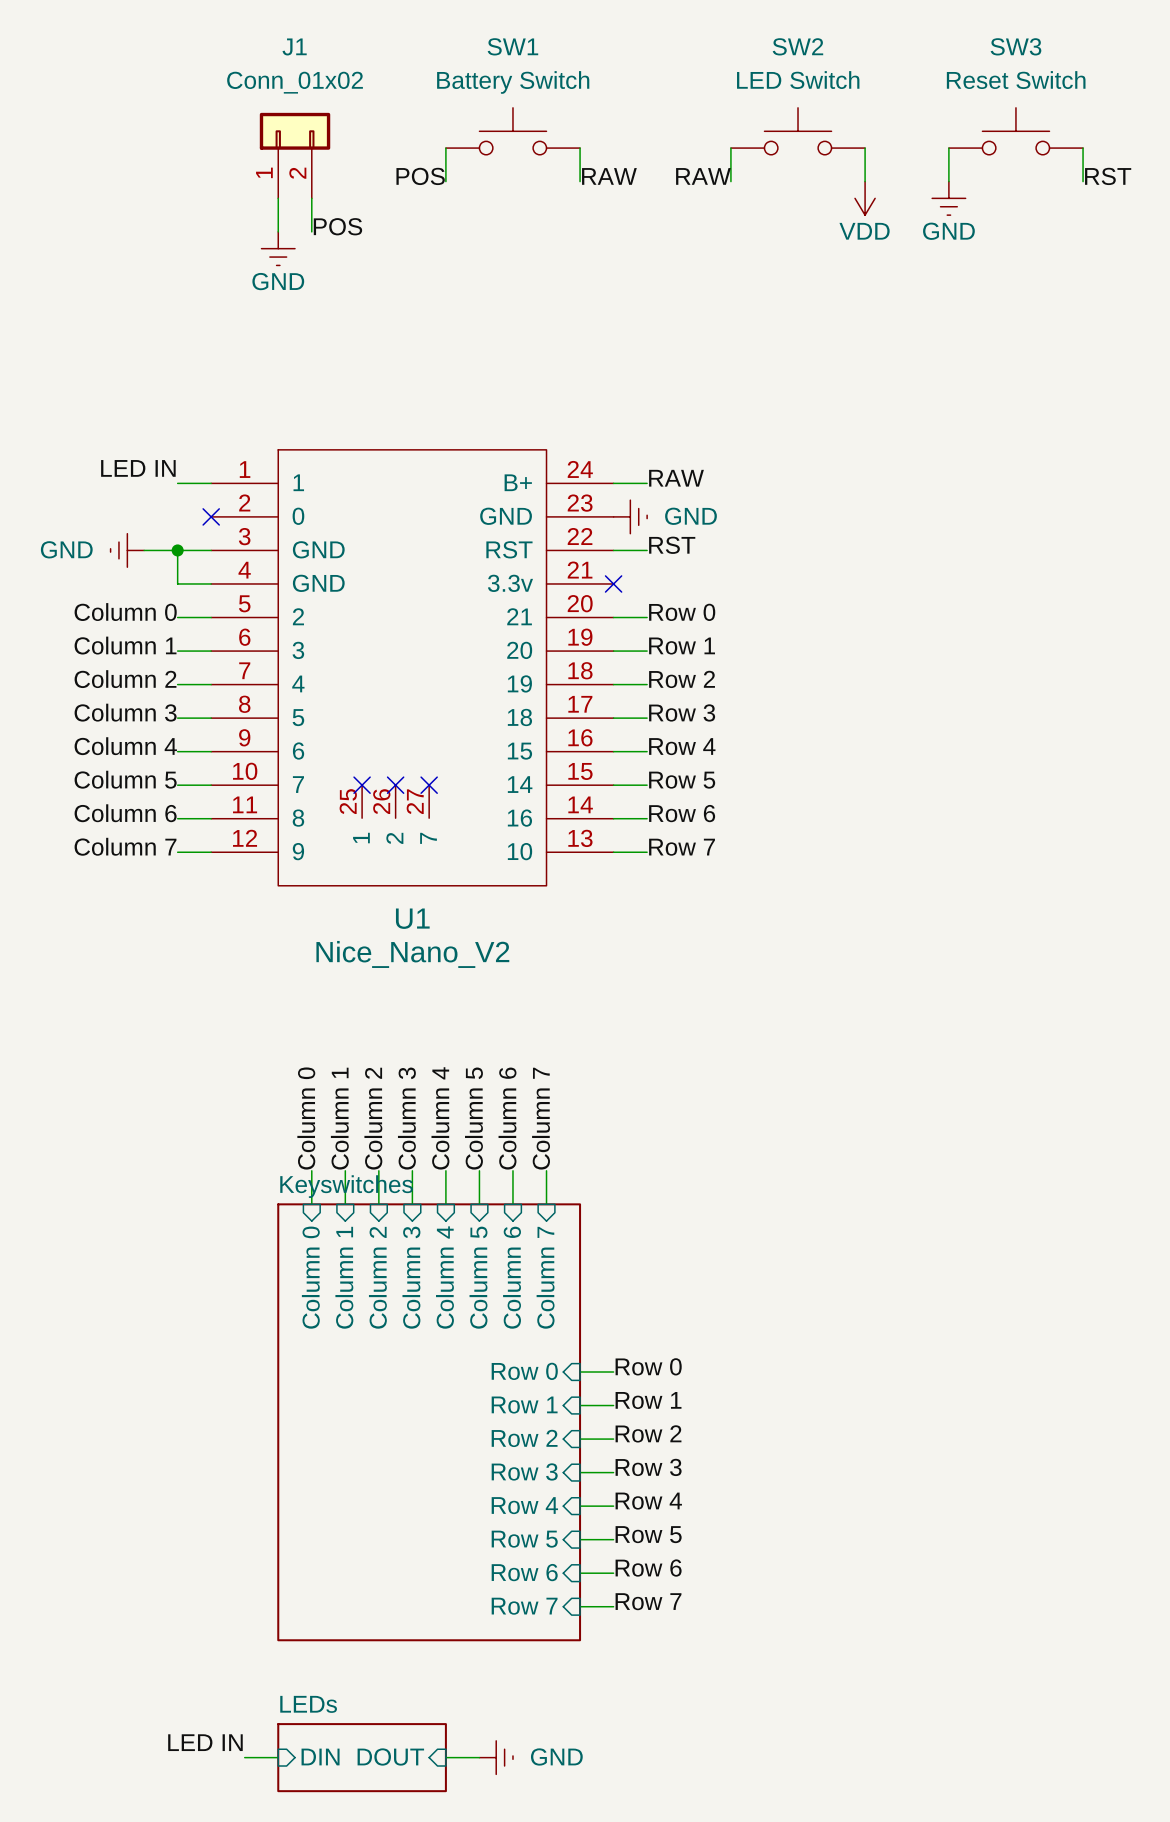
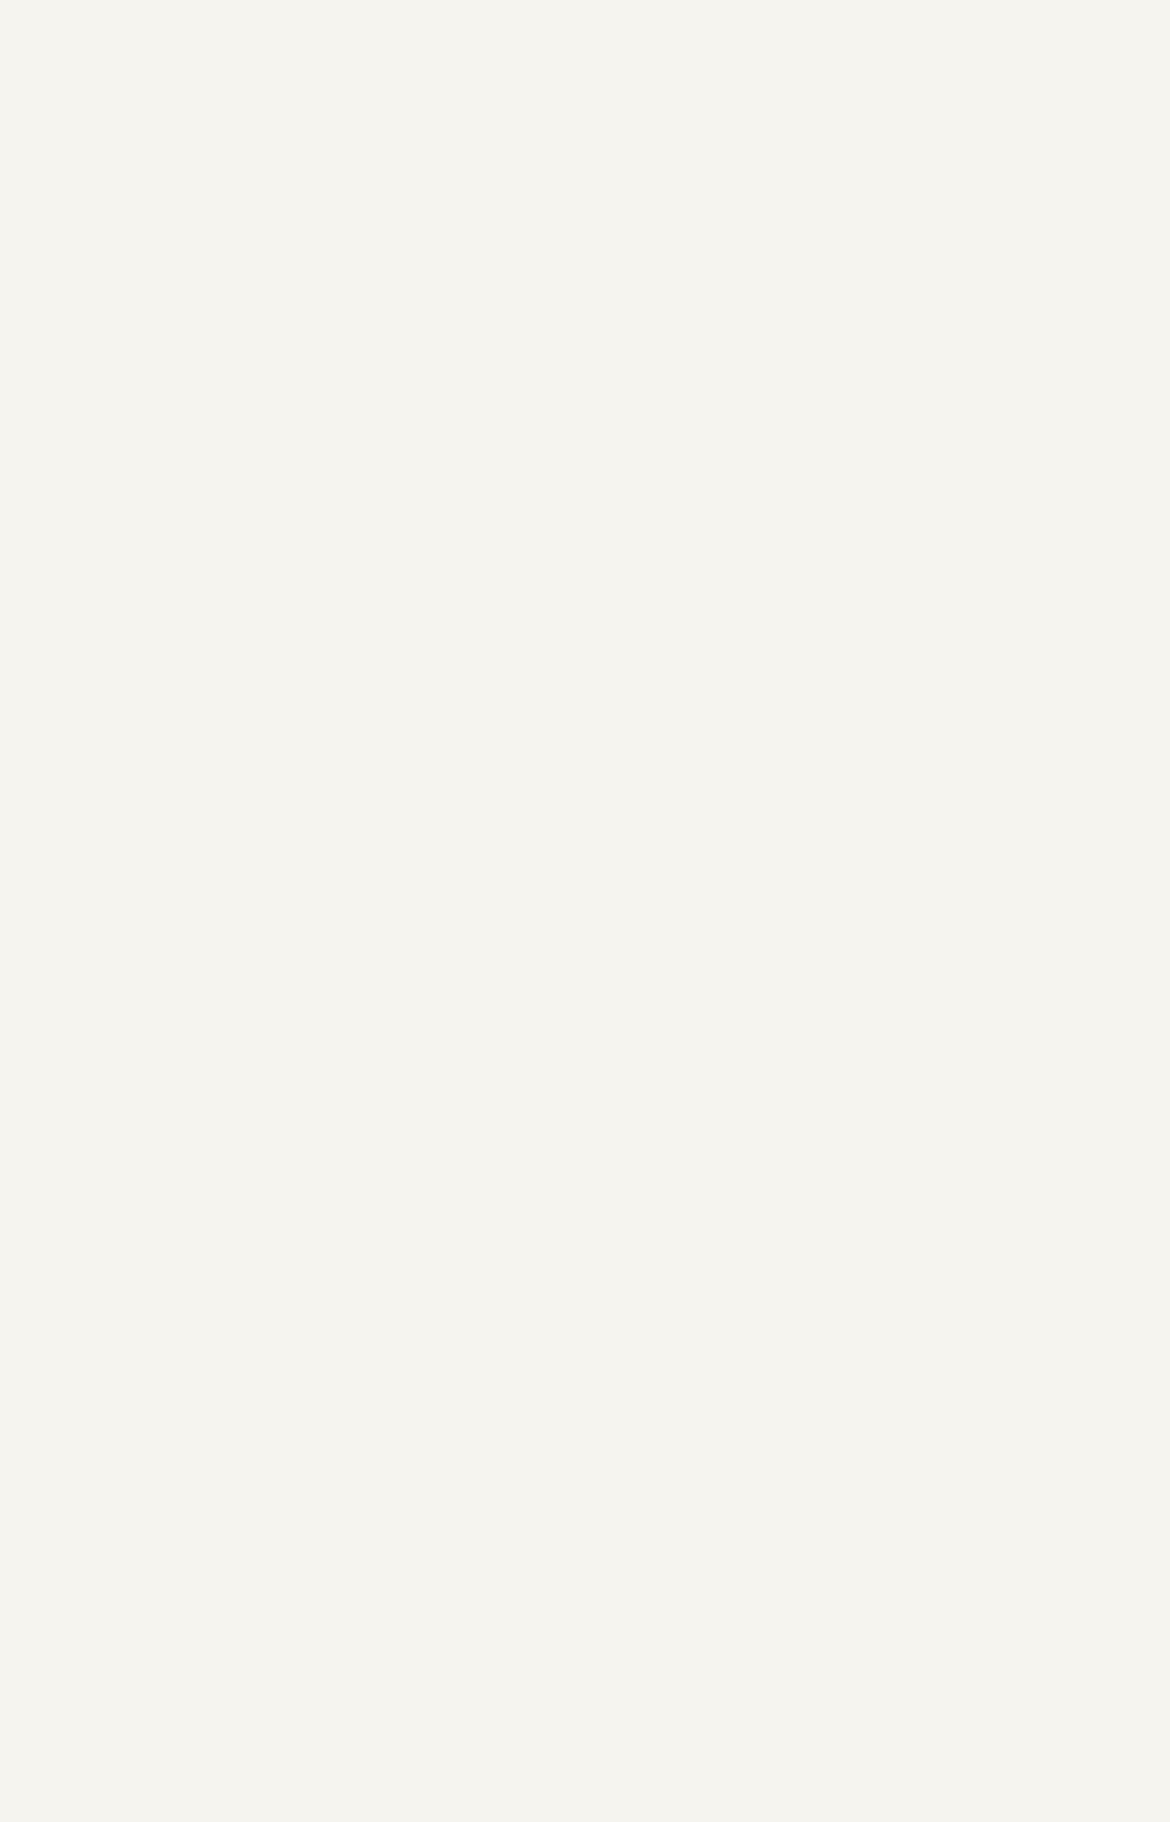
SW1: Battery Switch (512, 131) -> none
SW2: LED Switch (798, 131) -> none
SW3: Reset Switch (1015, 131) -> none
wire: (445, 148) (445, 181) -> none
wire: (580, 148) (580, 181) -> none
wire: (730, 148) (730, 181) -> none
wire: (865, 148) (865, 181) -> none
wire: (948, 148) (948, 181) -> none
wire: (1083, 148) (1083, 181) -> none
J1: Conn_01x02 (295, 155) -> none
label: POS (420, 176) -> none
label: RAW (609, 176) -> none
label: RAW (703, 176) -> none
label: RST (1108, 176) -> none
wire: (278, 198) (278, 231) -> none
wire: (311, 198) (311, 231) -> none
power symbol: VDD (865, 198) -> none
power symbol: GND (948, 198) -> none
label: POS (337, 226) -> none
power symbol: GND (278, 248) -> none
label: LED IN (138, 468) -> none
label: RAW (676, 478) -> none
wire: (177, 483) (211, 483) -> none
wire: (613, 483) (647, 483) -> none
no-connect mark: (211, 516) -> none
power symbol: GND (630, 516) -> none
label: RST (672, 545) -> none
power symbol: GND (127, 550) -> none
wire: (144, 550) (211, 550) -> none
wire: (177, 550) (177, 583) (211, 583) -> none
junction: (177, 550) -> none
wire: (613, 550) (647, 550) -> none
no-connect mark: (613, 583) -> none
label: Column 0 (125, 612) -> none
label: Row 0 (682, 612) -> none
wire: (177, 617) (211, 617) -> none
wire: (613, 617) (647, 617) -> none
label: Column 1 (125, 645) -> none
label: Row 1 (682, 646) -> none
wire: (177, 651) (211, 651) -> none
wire: (613, 651) (647, 651) -> none
U1: Nice_Nano_V2 (412, 667) -> none
label: Column 2 (125, 679) -> none
label: Row 2 (682, 679) -> none
wire: (177, 684) (211, 684) -> none
wire: (613, 684) (647, 684) -> none
label: Column 3 (125, 712) -> none
label: Row 3 (682, 712) -> none
wire: (177, 718) (211, 718) -> none
wire: (613, 718) (647, 718) -> none
label: Column 4 (125, 746) -> none
label: Row 4 (682, 746) -> none
wire: (177, 751) (211, 751) -> none
wire: (613, 751) (647, 751) -> none
label: Column 5 (125, 779) -> none
label: Row 5 (682, 780) -> none
wire: (177, 785) (211, 785) -> none
no-connect mark: (362, 785) -> none
no-connect mark: (395, 785) -> none
no-connect mark: (429, 785) -> none
wire: (613, 785) (647, 785) -> none
label: Column 6 (125, 813) -> none
label: Row 6 (682, 813) -> none
wire: (177, 818) (211, 818) -> none
wire: (613, 818) (647, 818) -> none
label: Column 7 (125, 846) -> none
label: Row 7 (682, 847) -> none
wire: (177, 852) (211, 852) -> none
wire: (613, 852) (647, 852) -> none
label: Column 0 (306, 1118) -> none
label: Column 1 (339, 1118) -> none
label: Column 2 (373, 1118) -> none
label: Column 3 (406, 1118) -> none
label: Column 4 (440, 1118) -> none
label: Column 5 (473, 1118) -> none
label: Column 6 (507, 1118) -> none
label: Column 7 (541, 1118) -> none
wire: (311, 1170) (311, 1204) -> none
wire: (345, 1170) (345, 1204) -> none
wire: (378, 1170) (378, 1204) -> none
wire: (412, 1170) (412, 1204) -> none
wire: (445, 1170) (445, 1204) -> none
wire: (479, 1170) (479, 1204) -> none
wire: (512, 1170) (512, 1204) -> none
wire: (546, 1170) (546, 1204) -> none
sheet pin: Column 0 (310, 1277) -> none
sheet pin: Column 1 (344, 1277) -> none
sheet pin: Column 2 (377, 1277) -> none
sheet pin: Column 3 (411, 1277) -> none
sheet pin: Column 4 (444, 1277) -> none
sheet pin: Column 5 (478, 1277) -> none
sheet pin: Column 6 (512, 1277) -> none
sheet pin: Column 7 (545, 1277) -> none
label: Row 0 (648, 1366) -> none
sheet pin: Row 0 (524, 1371) -> none
wire: (580, 1372) (613, 1372) -> none
label: Row 1 (648, 1400) -> none
sheet pin: Row 1 (524, 1405) -> none
wire: (580, 1405) (613, 1405) -> none
sheet Keyswitches: (429, 1422) -> none
label: Row 2 (648, 1433) -> none
sheet pin: Row 2 (524, 1438) -> none
wire: (580, 1439) (613, 1439) -> none
label: Row 3 (648, 1467) -> none
sheet pin: Row 3 (524, 1471) -> none
wire: (580, 1472) (613, 1472) -> none
label: Row 4 (648, 1501) -> none
sheet pin: Row 4 (524, 1505) -> none
wire: (580, 1506) (613, 1506) -> none
label: Row 5 (648, 1534) -> none
sheet pin: Row 5 (524, 1539) -> none
wire: (580, 1539) (613, 1539) -> none
label: Row 6 (648, 1568) -> none
sheet pin: Row 6 (524, 1572) -> none
wire: (580, 1573) (613, 1573) -> none
label: Row 7 (648, 1601) -> none
sheet pin: Row 7 (524, 1606) -> none
wire: (580, 1606) (613, 1606) -> none
label: LED IN (205, 1742) -> none
sheet pin: DOUT (390, 1756) -> none
wire: (244, 1757) (278, 1757) -> none
sheet pin: DIN (320, 1757) -> none
sheet LEDs: (362, 1757) -> none
wire: (445, 1757) (479, 1757) -> none
power symbol: GND (496, 1757) -> none

